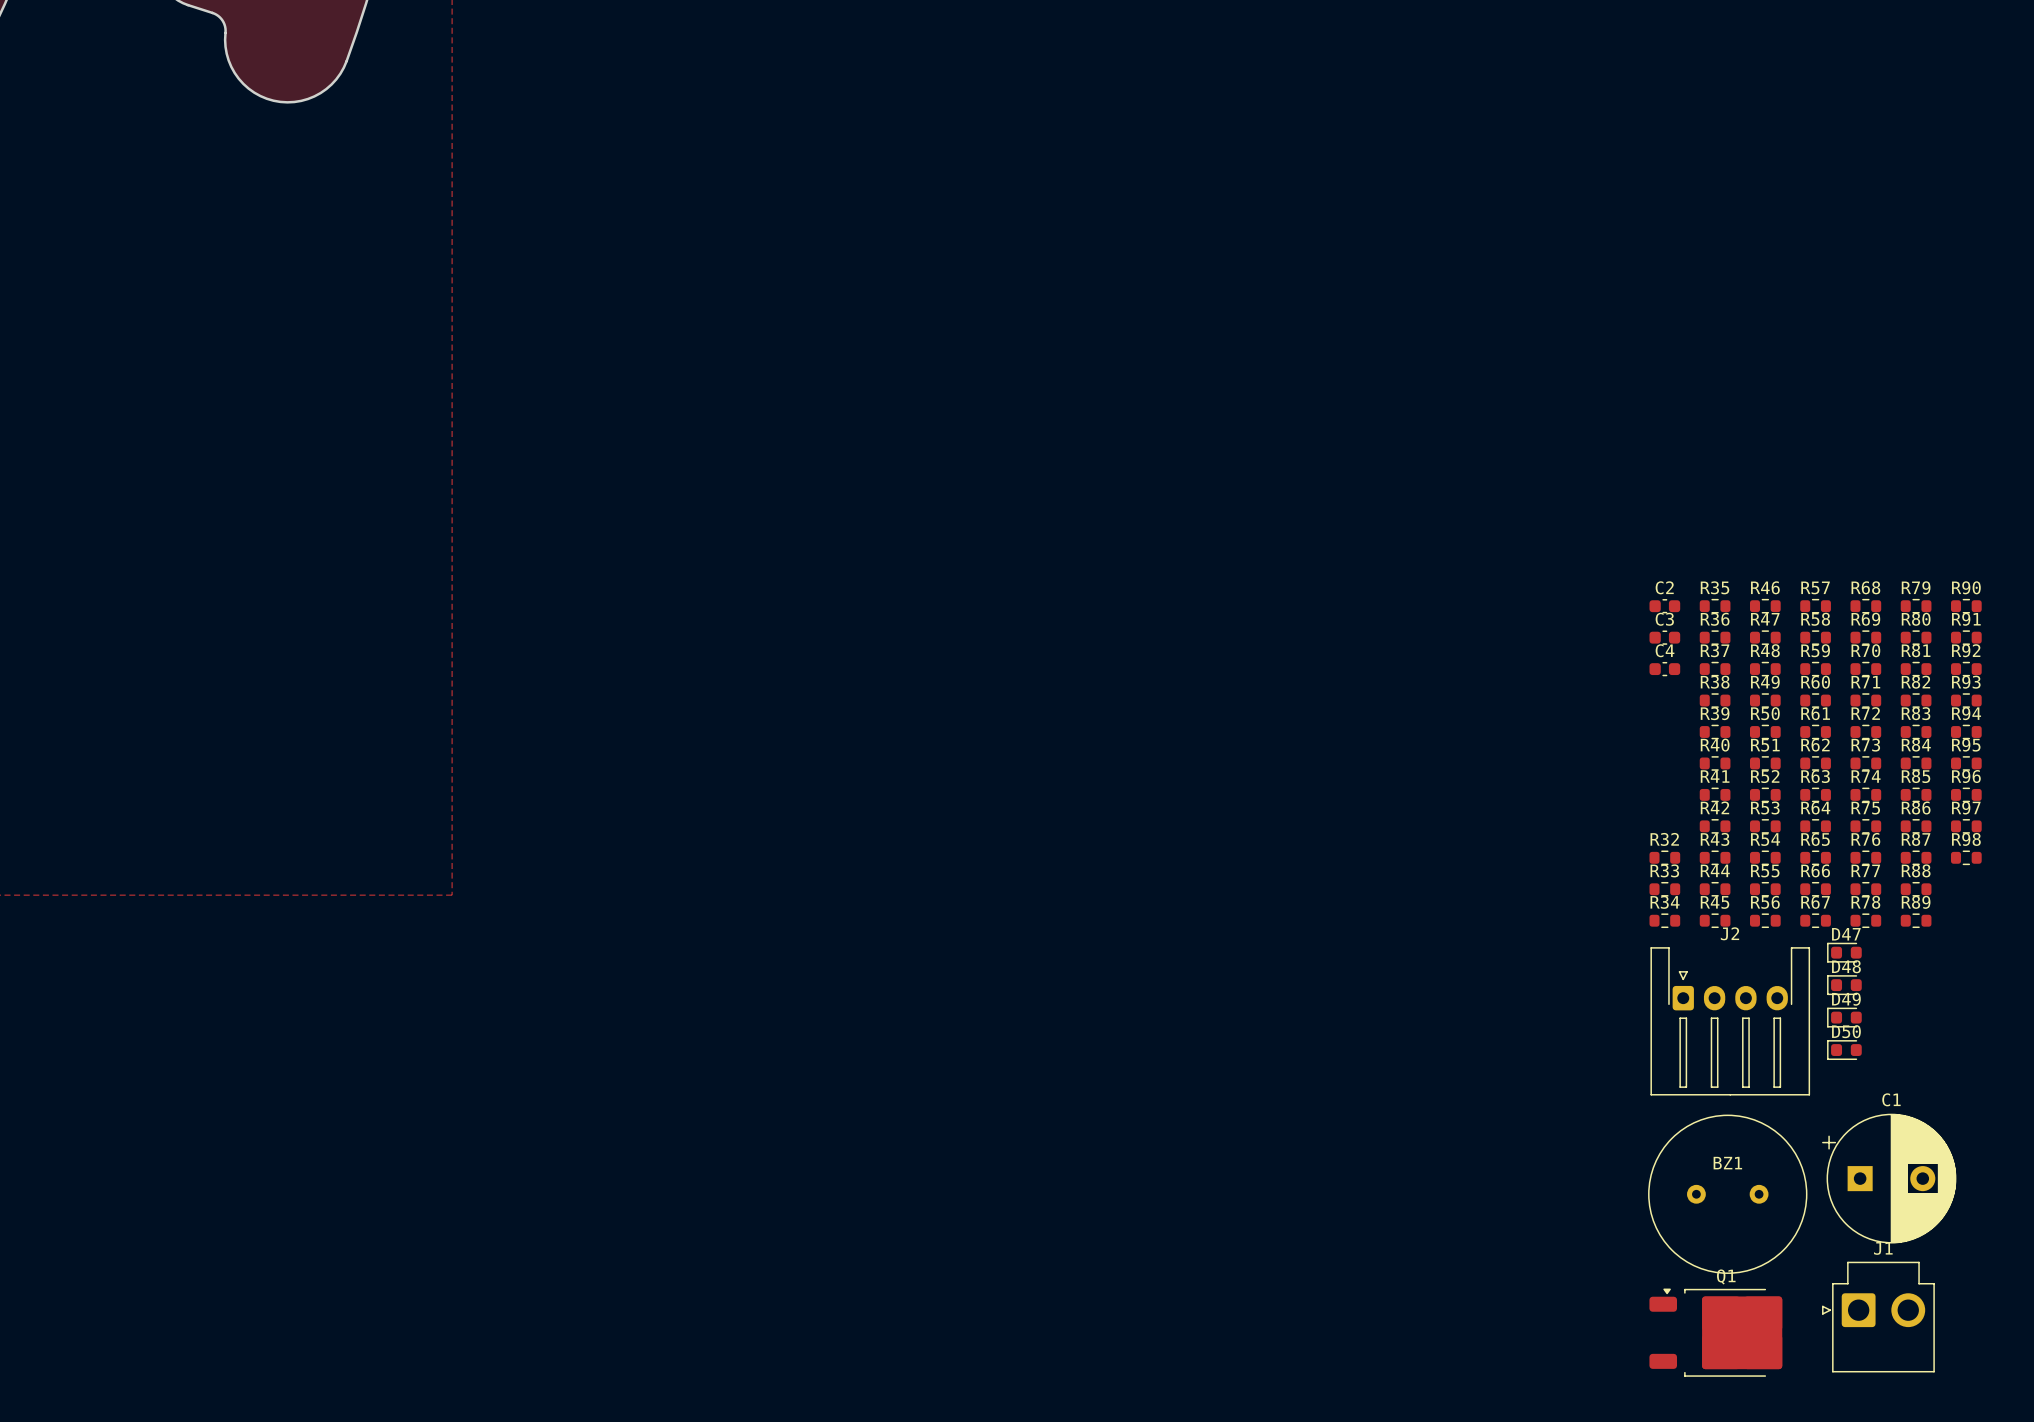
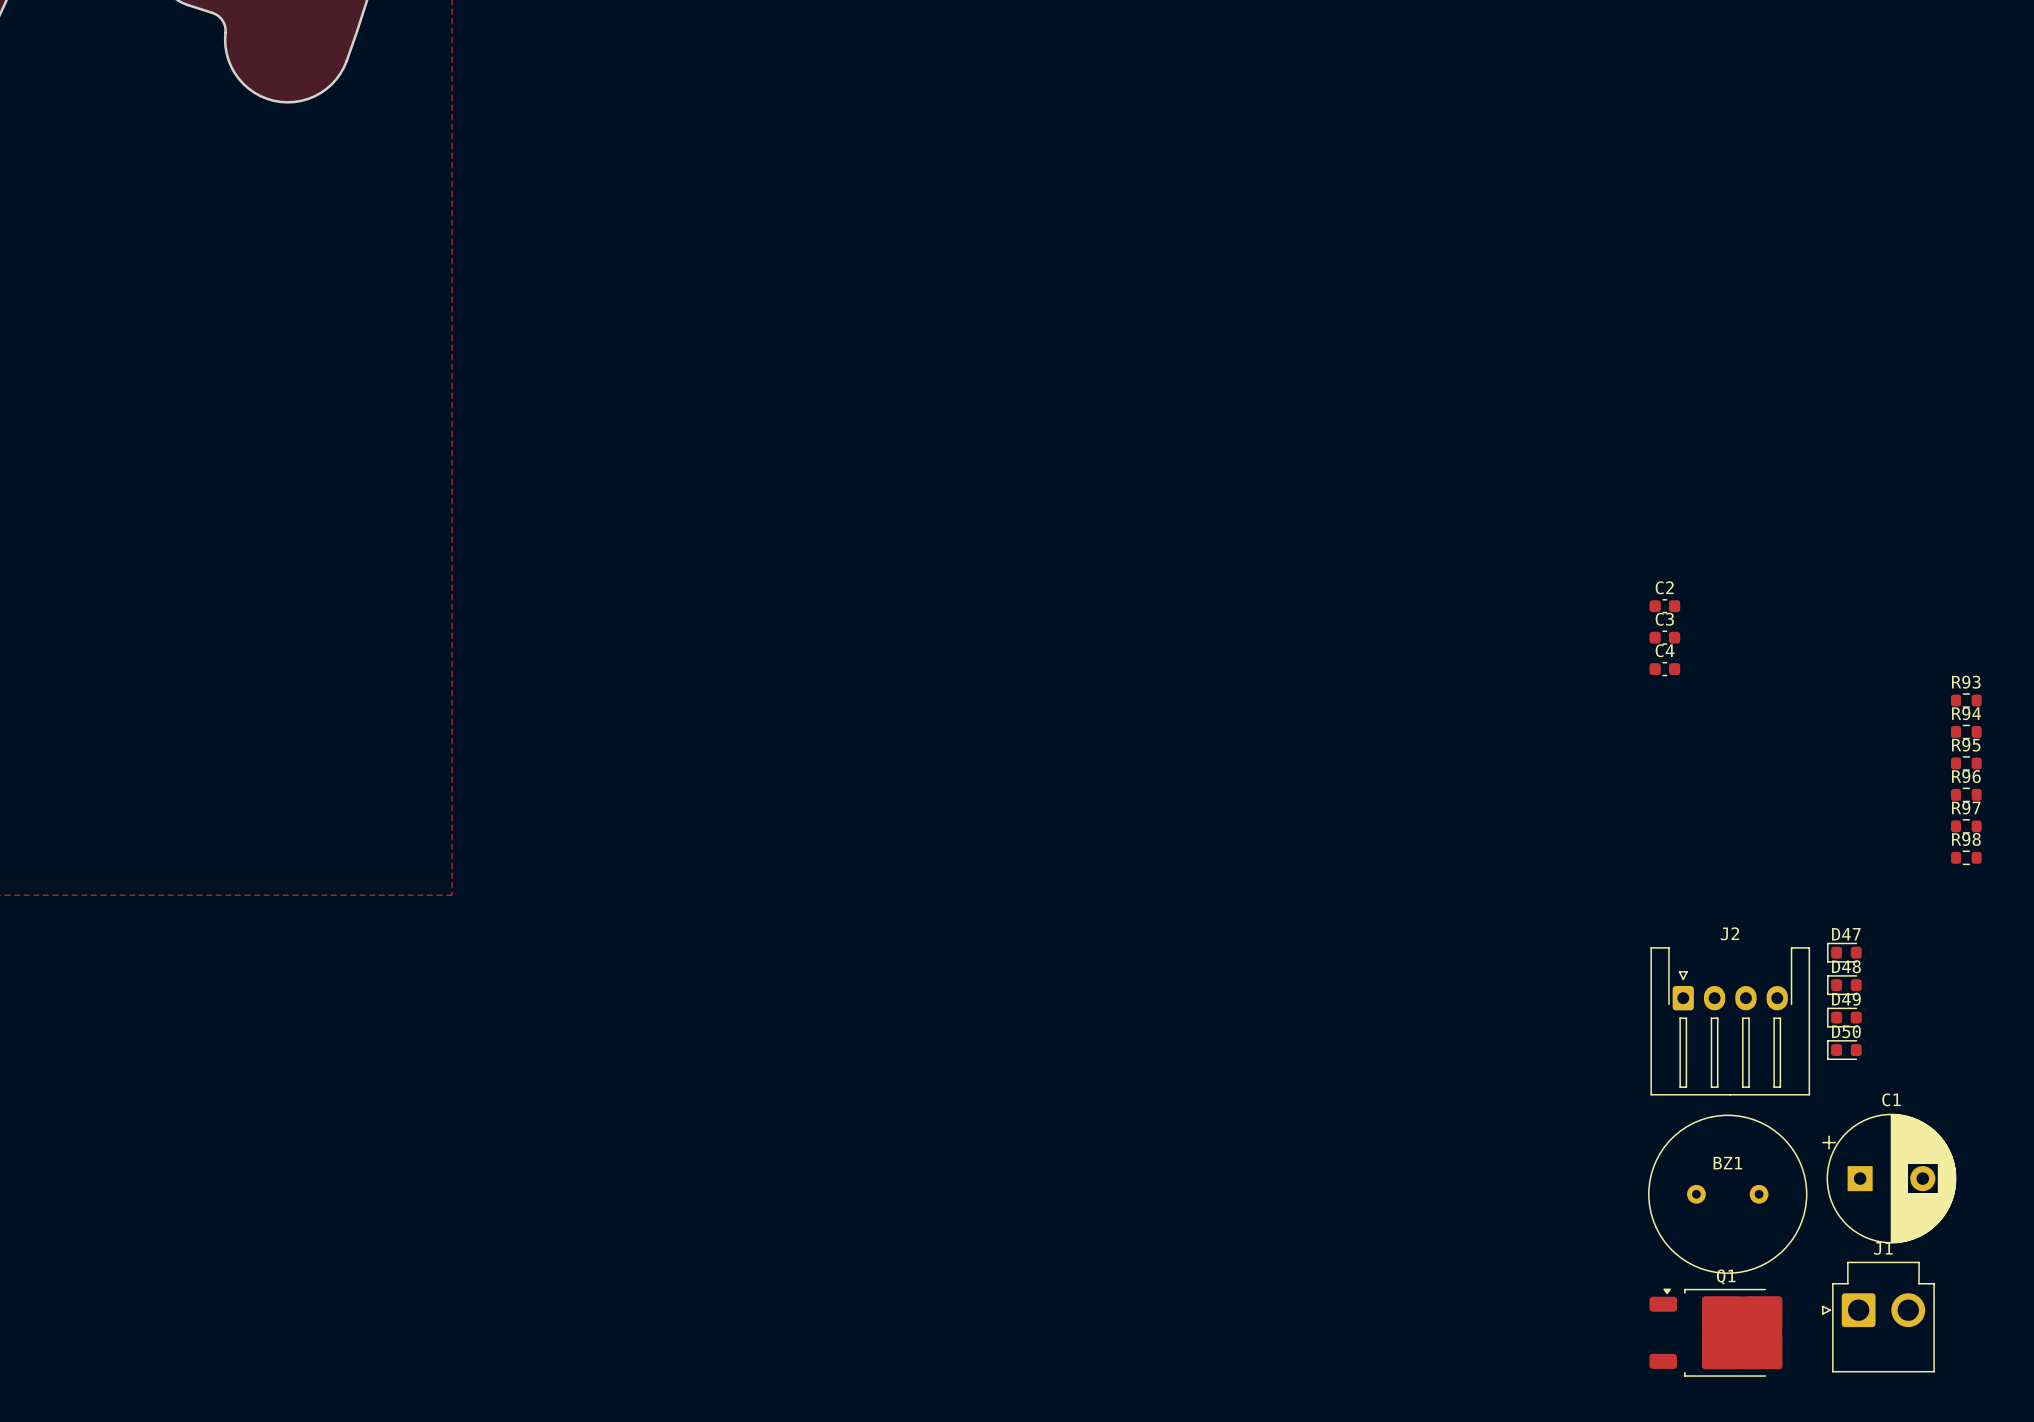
R35: (1715, 606) -> none
R46: (1765, 606) -> none
R57: (1815, 606) -> none
R68: (1865, 606) -> none
R79: (1916, 606) -> none
R90: (1966, 606) -> none
R36: (1715, 637) -> none
R47: (1765, 637) -> none
R58: (1815, 637) -> none
R69: (1865, 637) -> none
R80: (1916, 637) -> none
R91: (1966, 637) -> none
R37: (1715, 669) -> none
R48: (1765, 669) -> none
R59: (1815, 669) -> none
R70: (1865, 669) -> none
R81: (1916, 669) -> none
R92: (1966, 669) -> none
R38: (1715, 700) -> none
R49: (1765, 700) -> none
R60: (1815, 700) -> none
R71: (1865, 700) -> none
R82: (1916, 700) -> none
R39: (1715, 732) -> none
R50: (1765, 732) -> none
R61: (1815, 732) -> none
R72: (1865, 732) -> none
R83: (1916, 732) -> none
R40: (1715, 763) -> none
R51: (1765, 763) -> none
R62: (1815, 763) -> none
R73: (1865, 763) -> none
R84: (1916, 763) -> none
R41: (1715, 794) -> none
R52: (1765, 794) -> none
R63: (1815, 794) -> none
R74: (1865, 794) -> none
R85: (1916, 794) -> none
R42: (1715, 826) -> none
R53: (1765, 826) -> none
R64: (1815, 826) -> none
R75: (1865, 826) -> none
R86: (1916, 826) -> none
R32: (1664, 857) -> none
R43: (1715, 857) -> none
R54: (1765, 857) -> none
R65: (1815, 857) -> none
R76: (1865, 857) -> none
R87: (1916, 857) -> none
R33: (1664, 889) -> none
R44: (1715, 889) -> none
R55: (1765, 889) -> none
R66: (1815, 889) -> none
R77: (1865, 889) -> none
R88: (1916, 889) -> none
R34: (1664, 920) -> none
R45: (1715, 920) -> none
R56: (1765, 920) -> none
R67: (1815, 920) -> none
R78: (1865, 920) -> none
R89: (1916, 920) -> none

